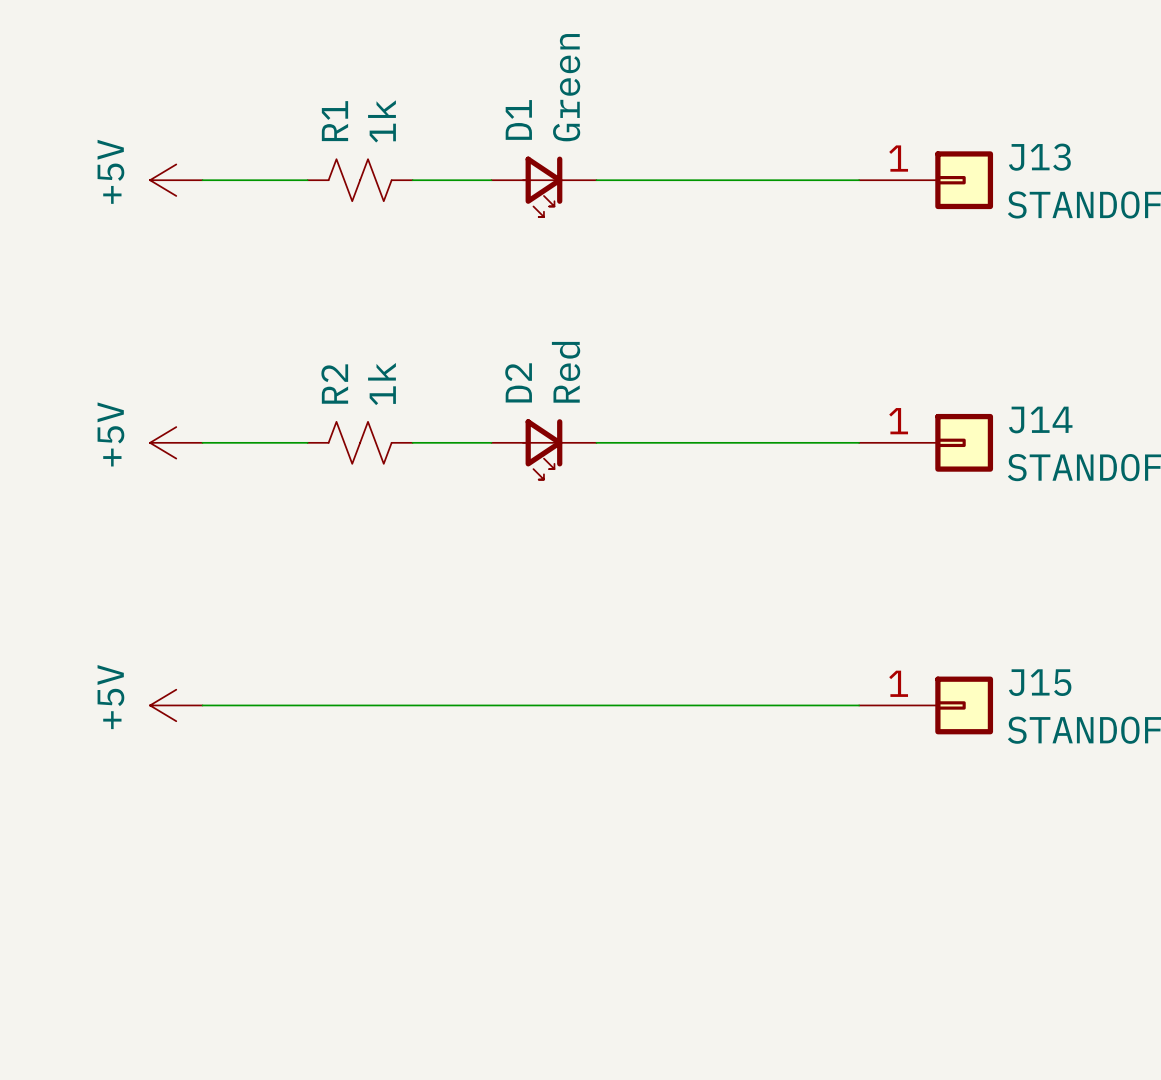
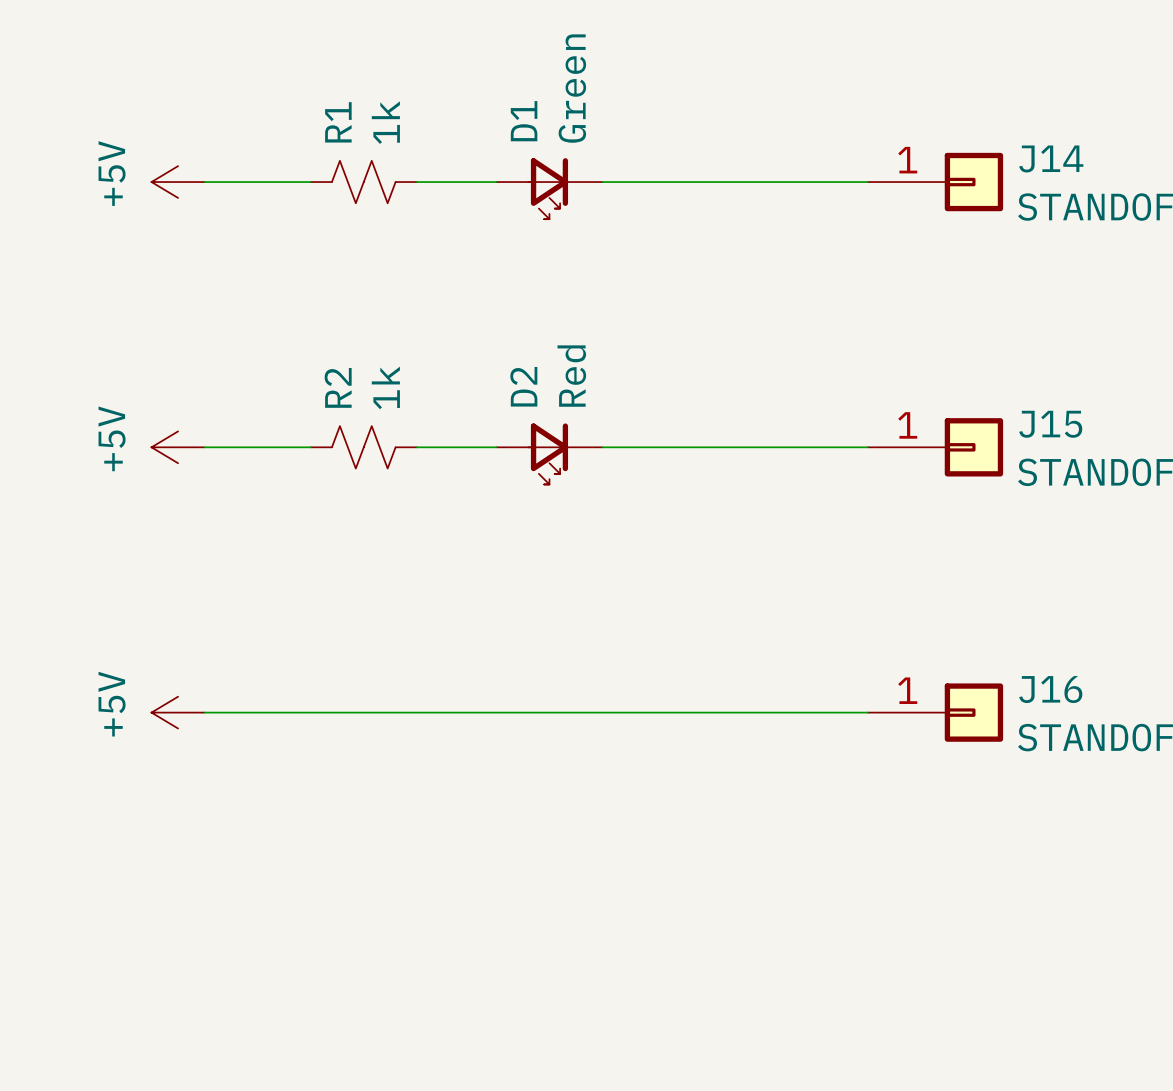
J13 name: J13 (1039, 157) -> J14 (1051, 158)
J14 name: J14 (1040, 420) -> J15 (1050, 424)
J15 name: J15 (1040, 682) -> J16 (1050, 689)

